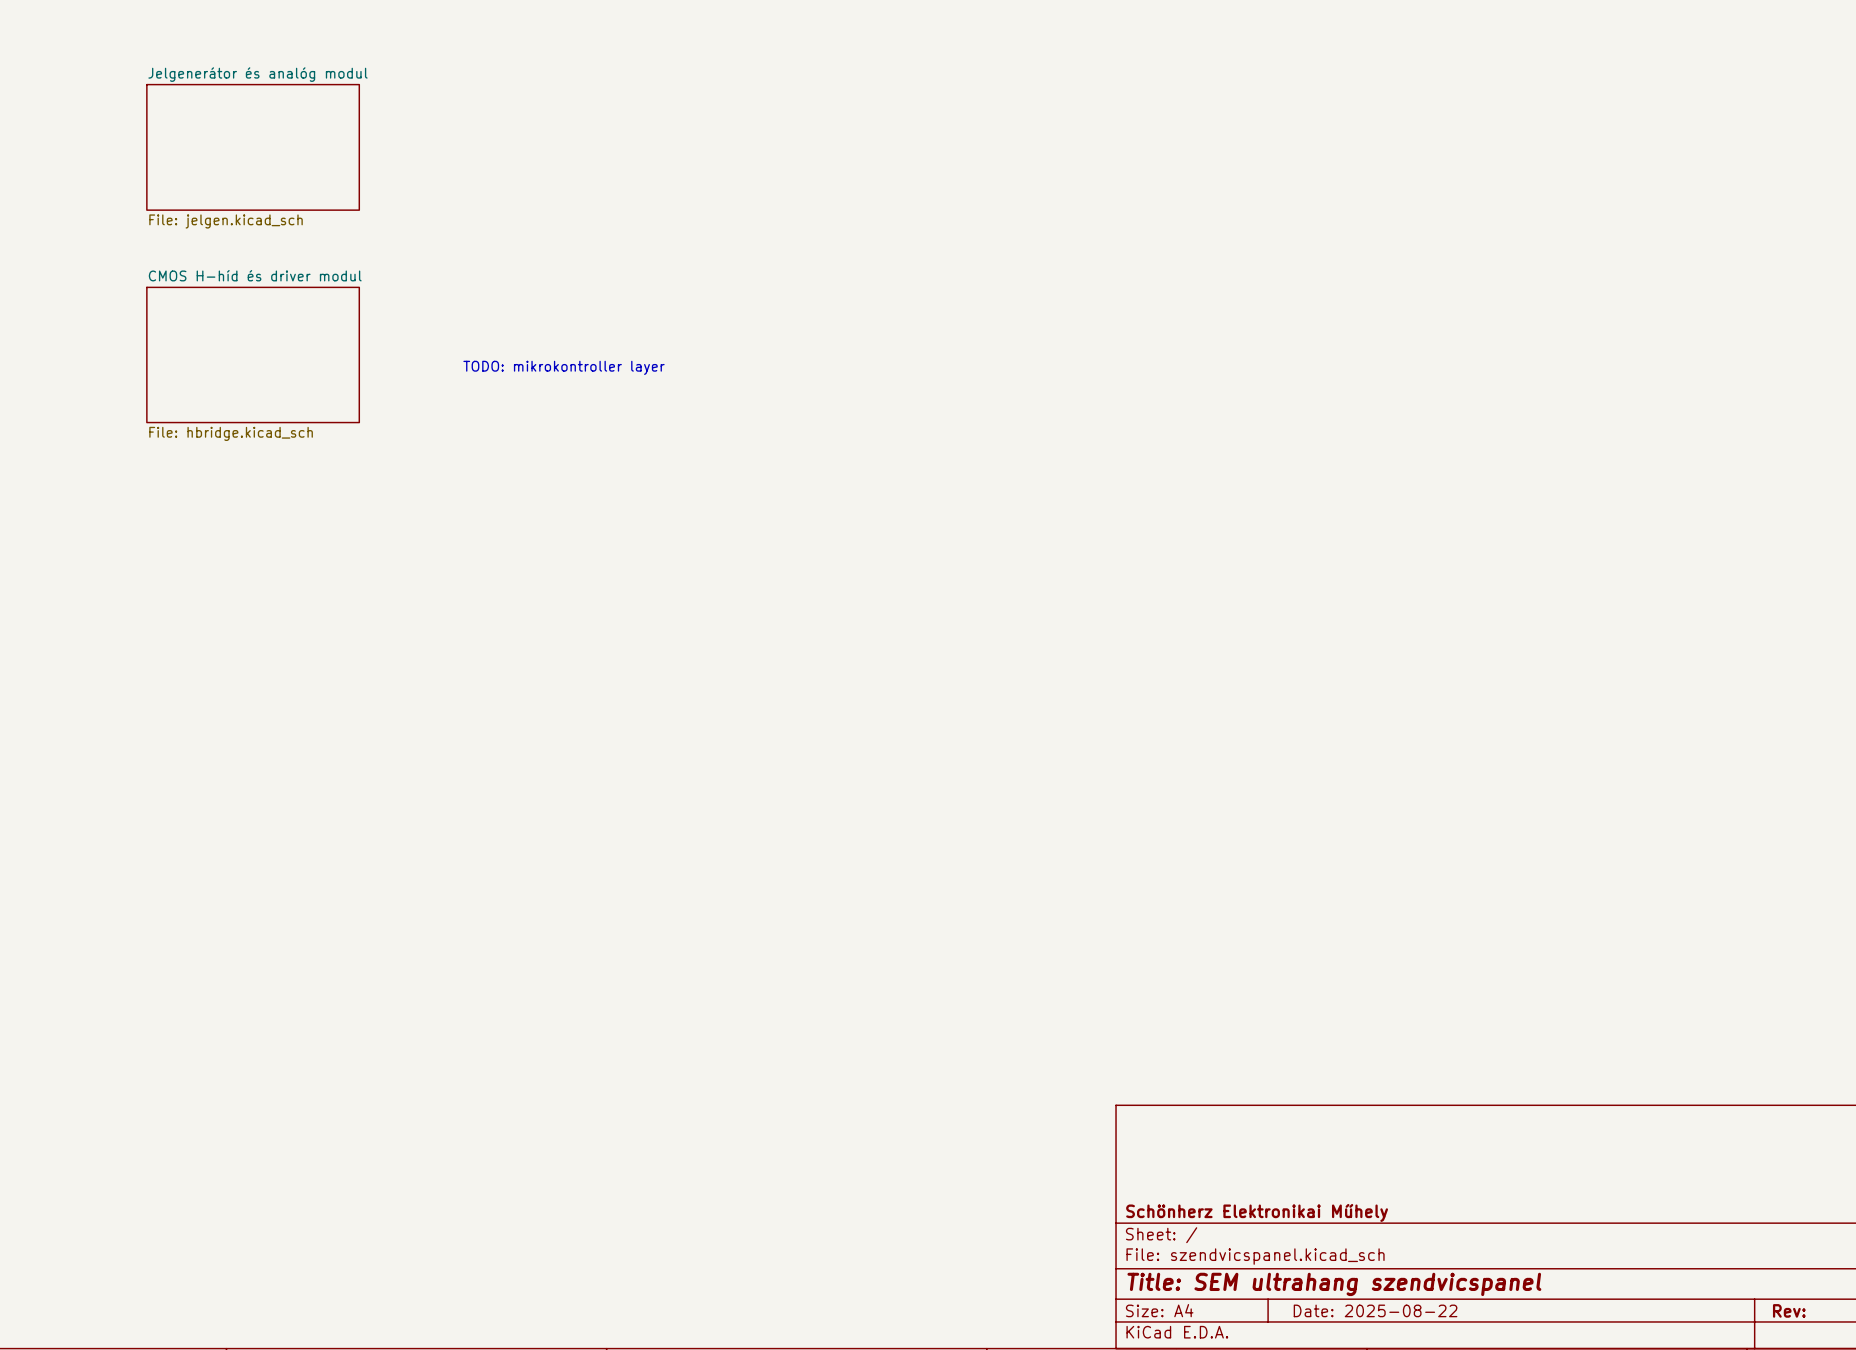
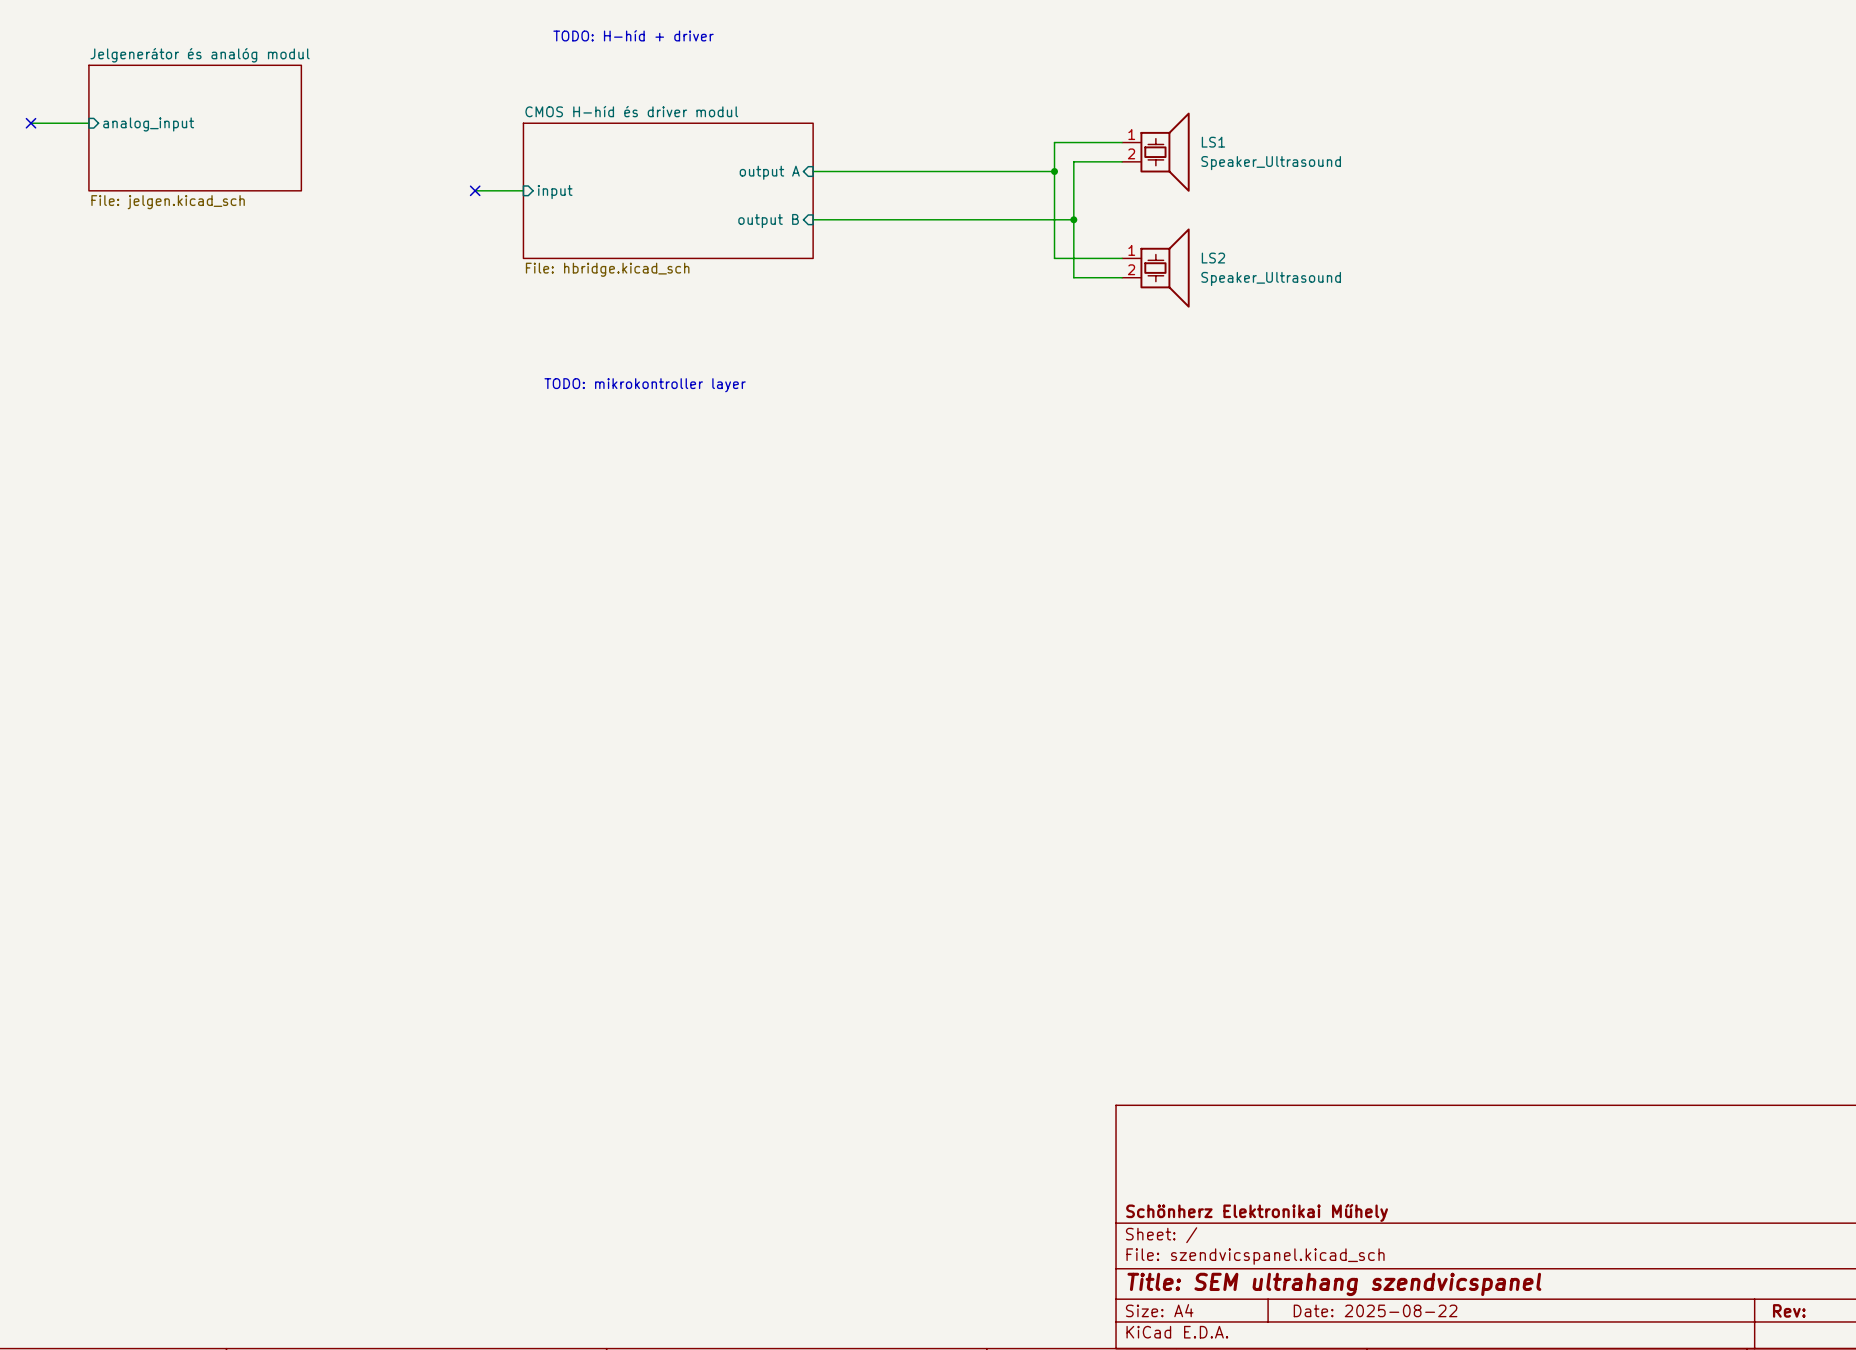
text: none -> TODO: H-híd + driver (633, 35)
wire: none -> (31, 123) (88, 123)
no-connect mark: none -> (31, 123)
sheet pin: none -> analog_input (148, 124)
wire: none -> (1122, 142) (1054, 142) (1054, 258) (1122, 258)
sheet Jelgenerátor és analóg modul position: (253, 147) -> (195, 128)
LS1: none -> Speaker_Ultrasound (1155, 152)
wire: none -> (1122, 161) (1073, 161) (1073, 277) (1122, 277)
wire: none -> (813, 171) (1054, 171)
junction: none -> (1054, 171)
sheet pin: none -> output A (769, 172)
wire: none -> (475, 190) (523, 190)
no-connect mark: none -> (475, 190)
sheet CMOS H-híd és driver modul: none -> File: hbridge.kicad_sch (668, 190)
sheet pin: none -> input (555, 192)
wire: none -> (813, 219) (1073, 219)
junction: none -> (1073, 219)
sheet pin: none -> output B (768, 221)
LS2: none -> Speaker_Ultrasound (1155, 268)
sheet CMOS H-híd és driver modul: File: hbridge.kicad_sch (253, 354) -> none
text position: TODO: mikrokontroller layer (564, 367) -> TODO: mikrokontroller layer (645, 385)

